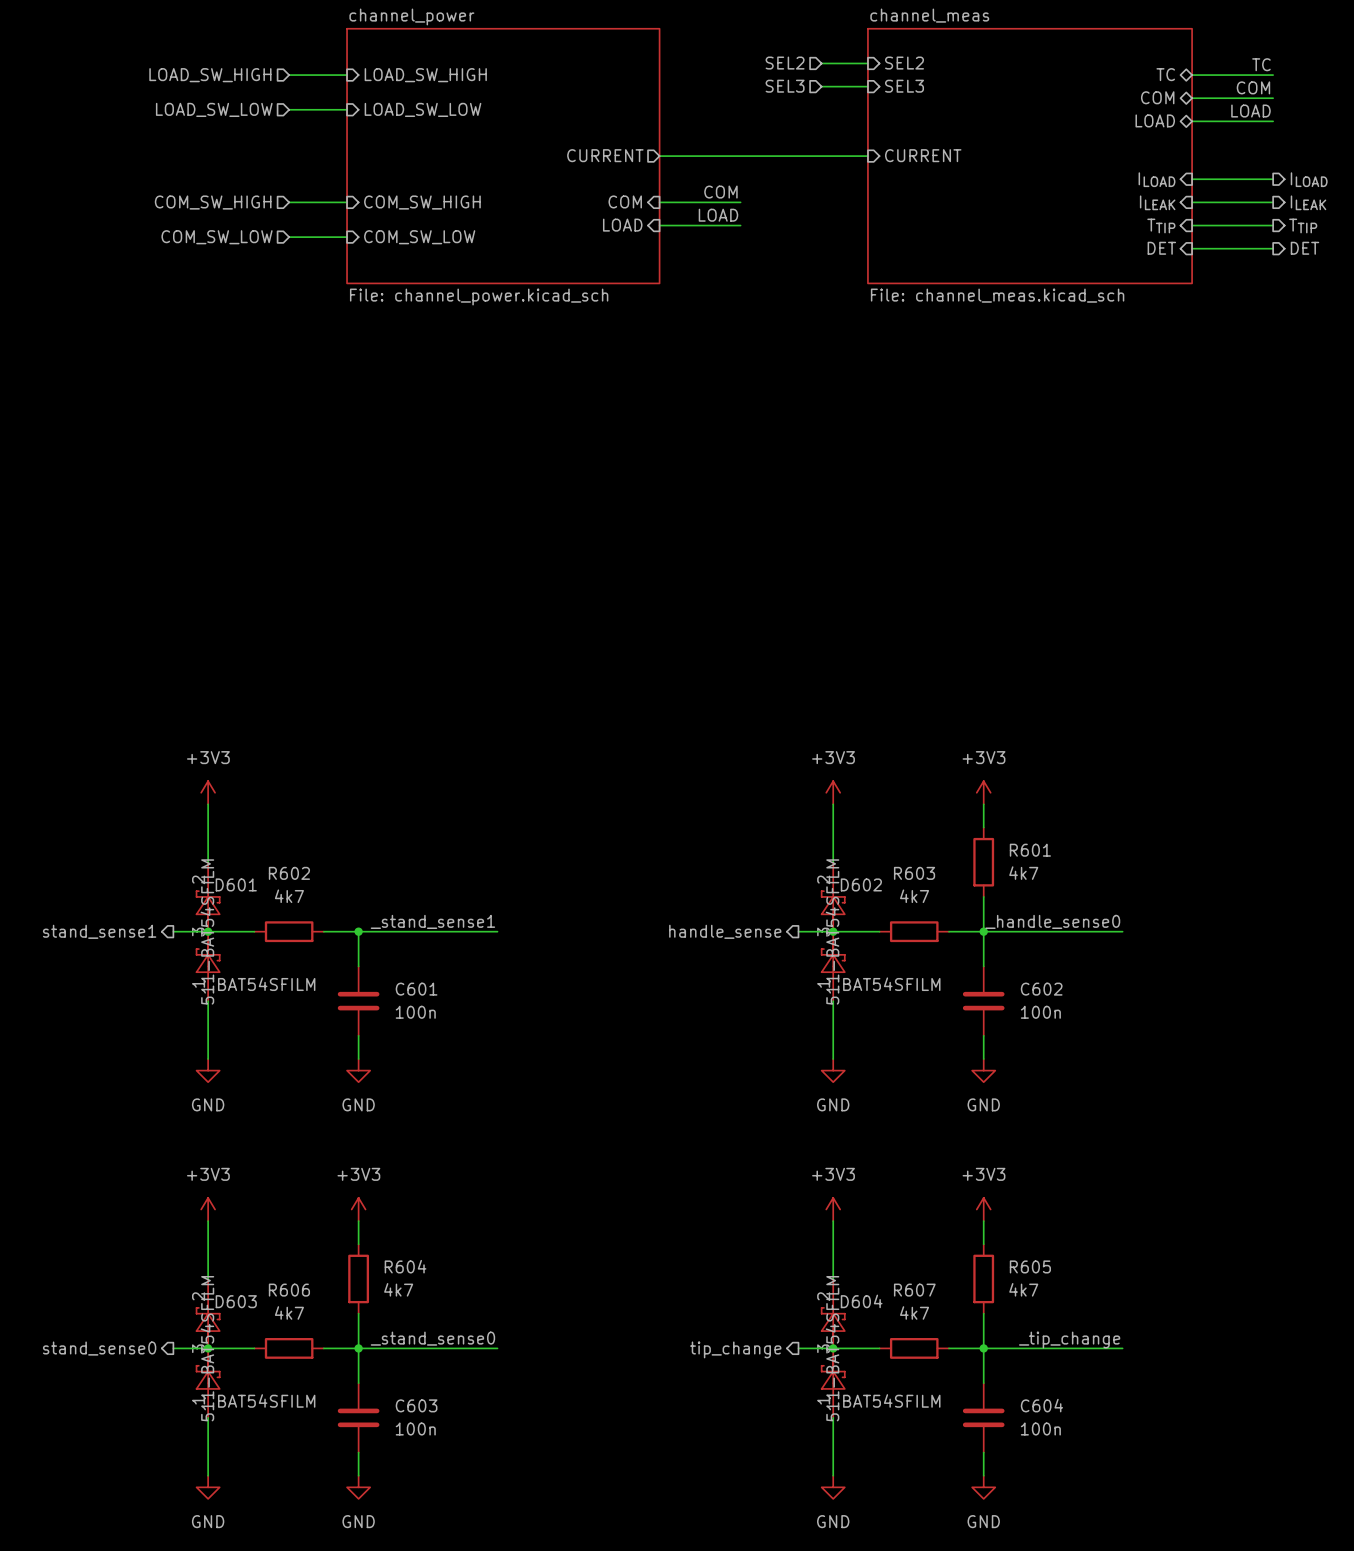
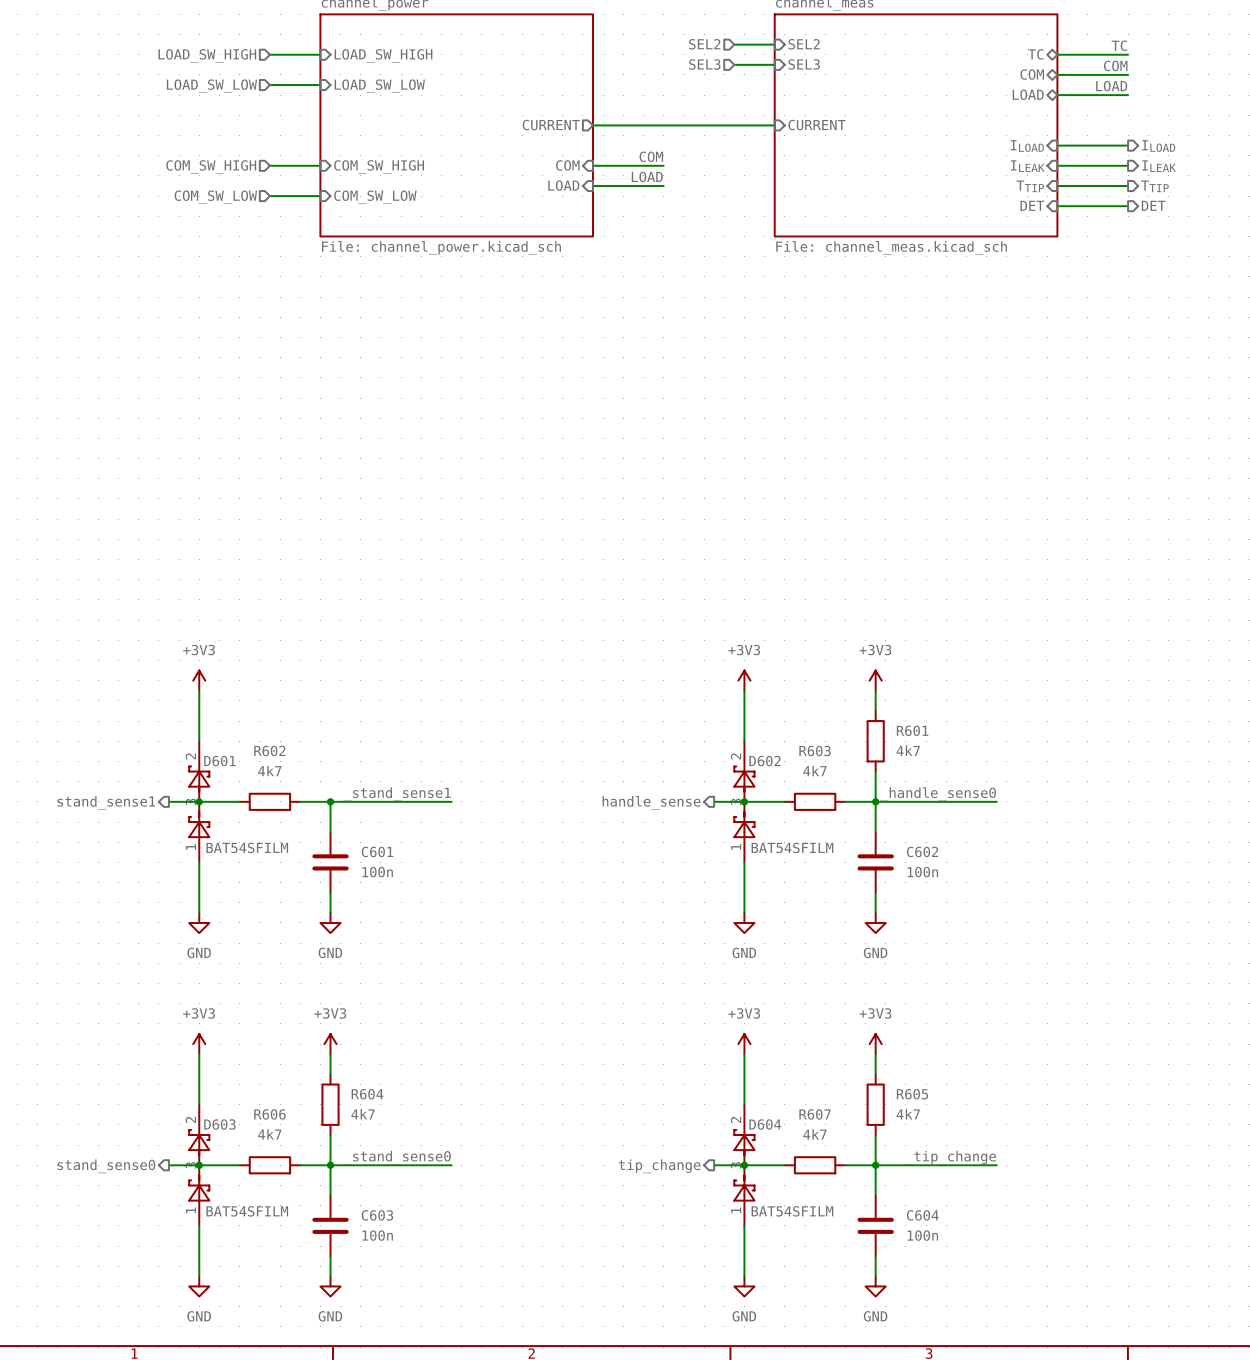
D601 text: 511-BAT54SFILM (207, 931) -> none
D602 text: 511-BAT54SFILM (832, 931) -> none
D603 text: 511-BAT54SFILM (207, 1348) -> none
D604 text: 511-BAT54SFILM (832, 1348) -> none

